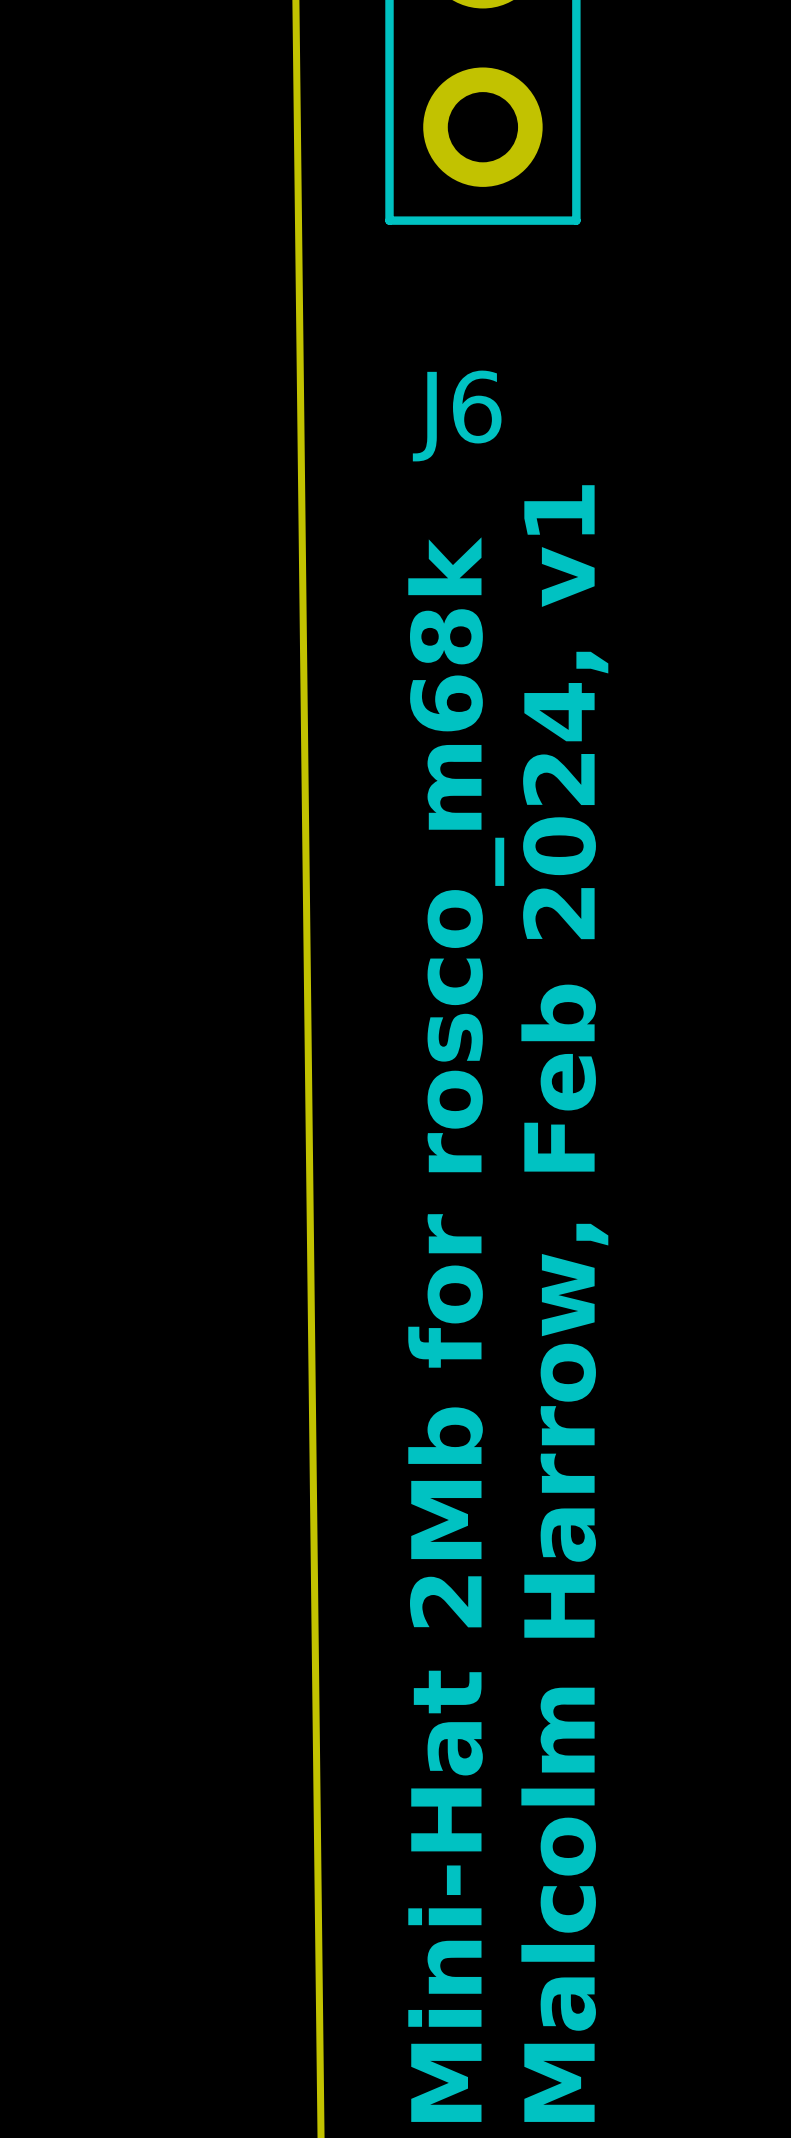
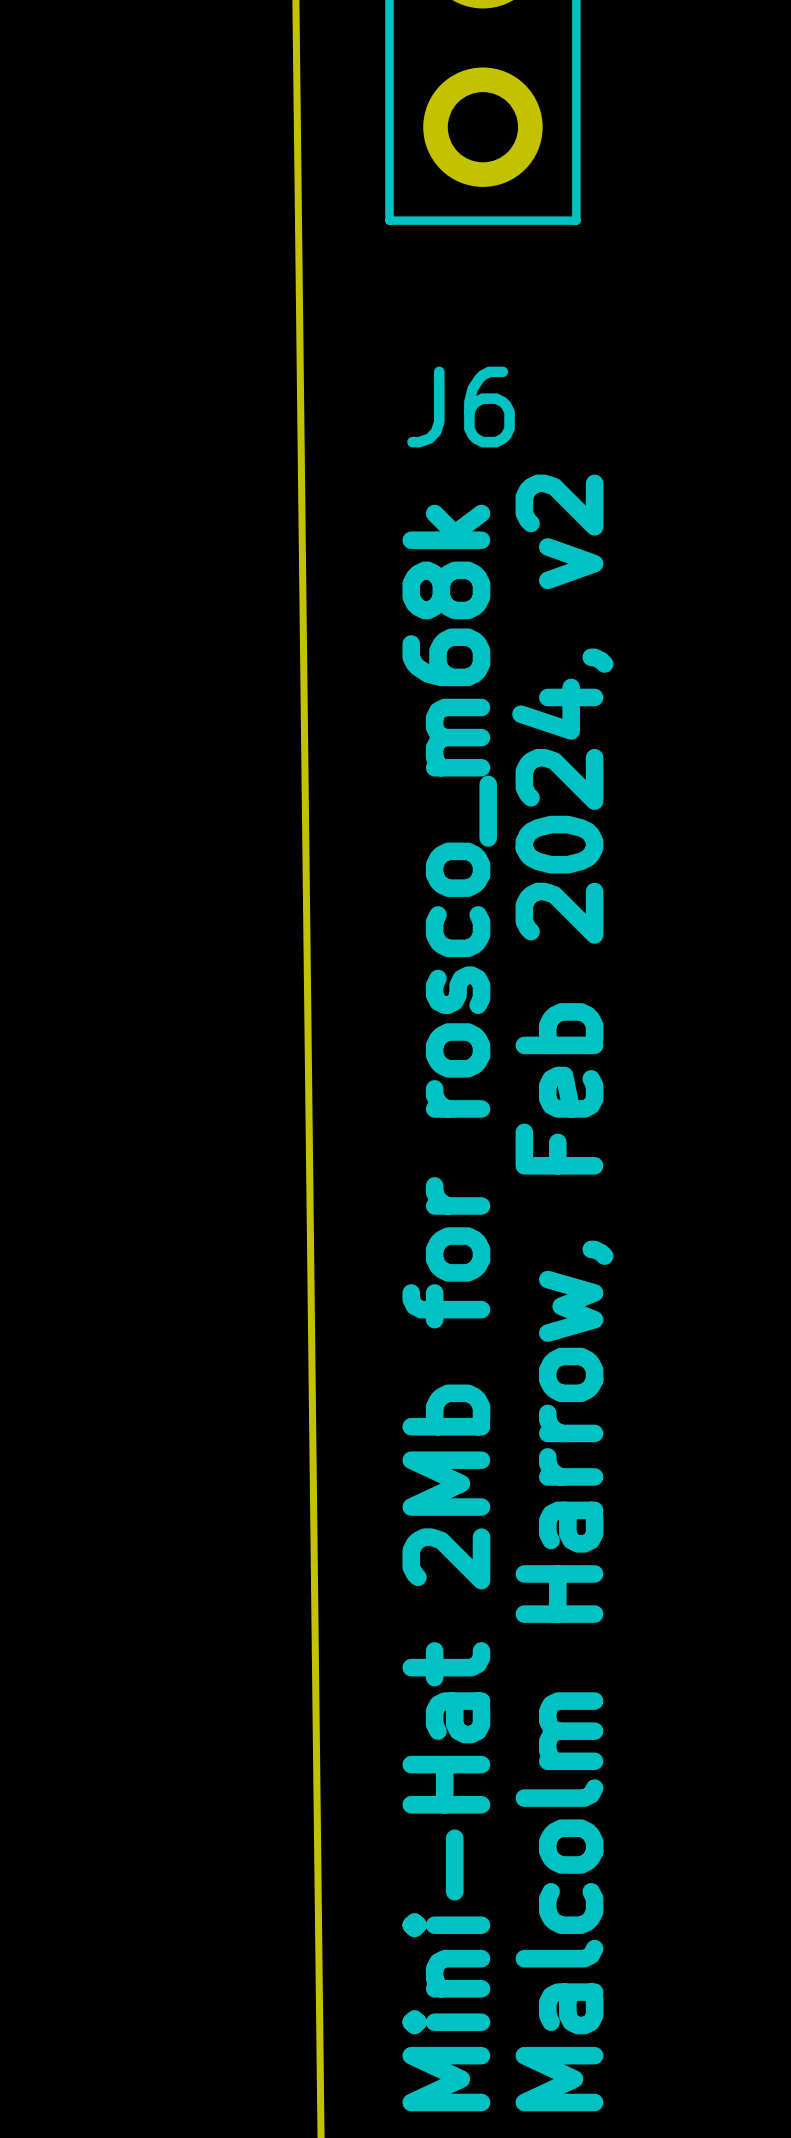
text: Malcolm Harrow, Feb 2024, v1 (564, 1303) -> Malcolm Harrow, Feb 2024, v2 (562, 1292)

